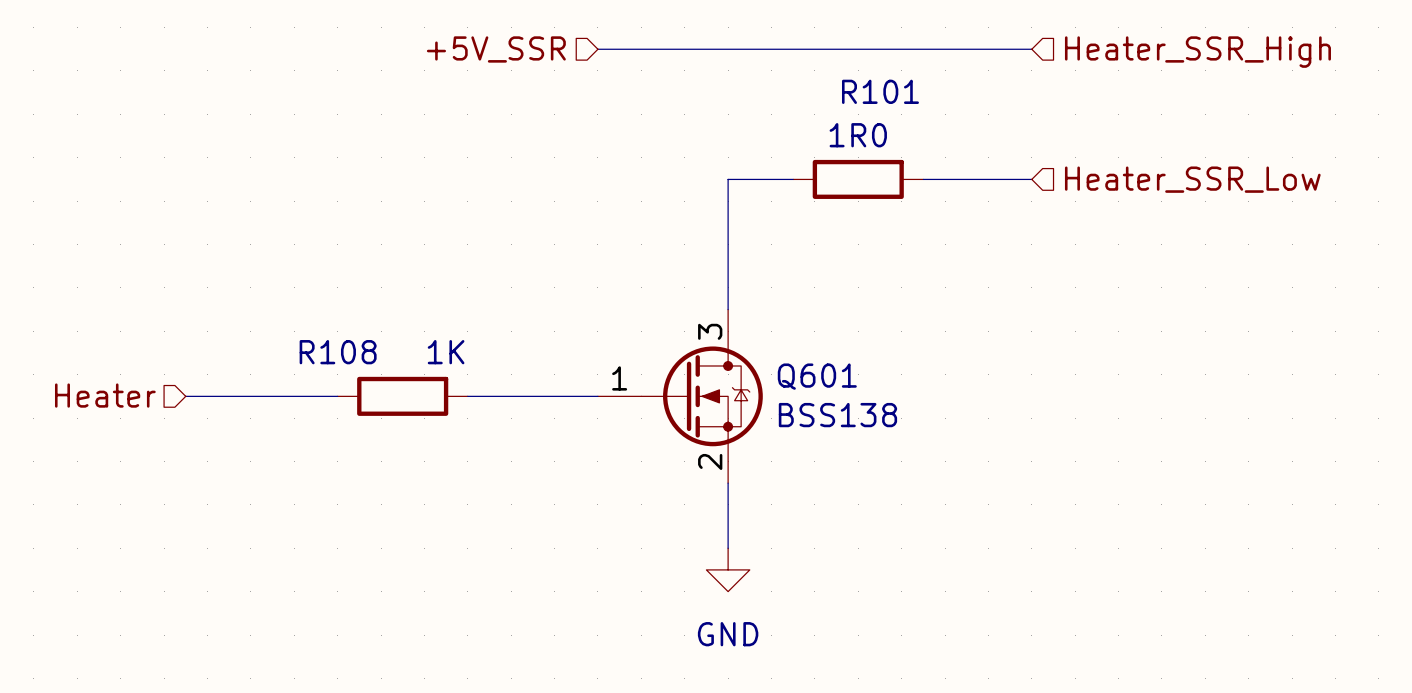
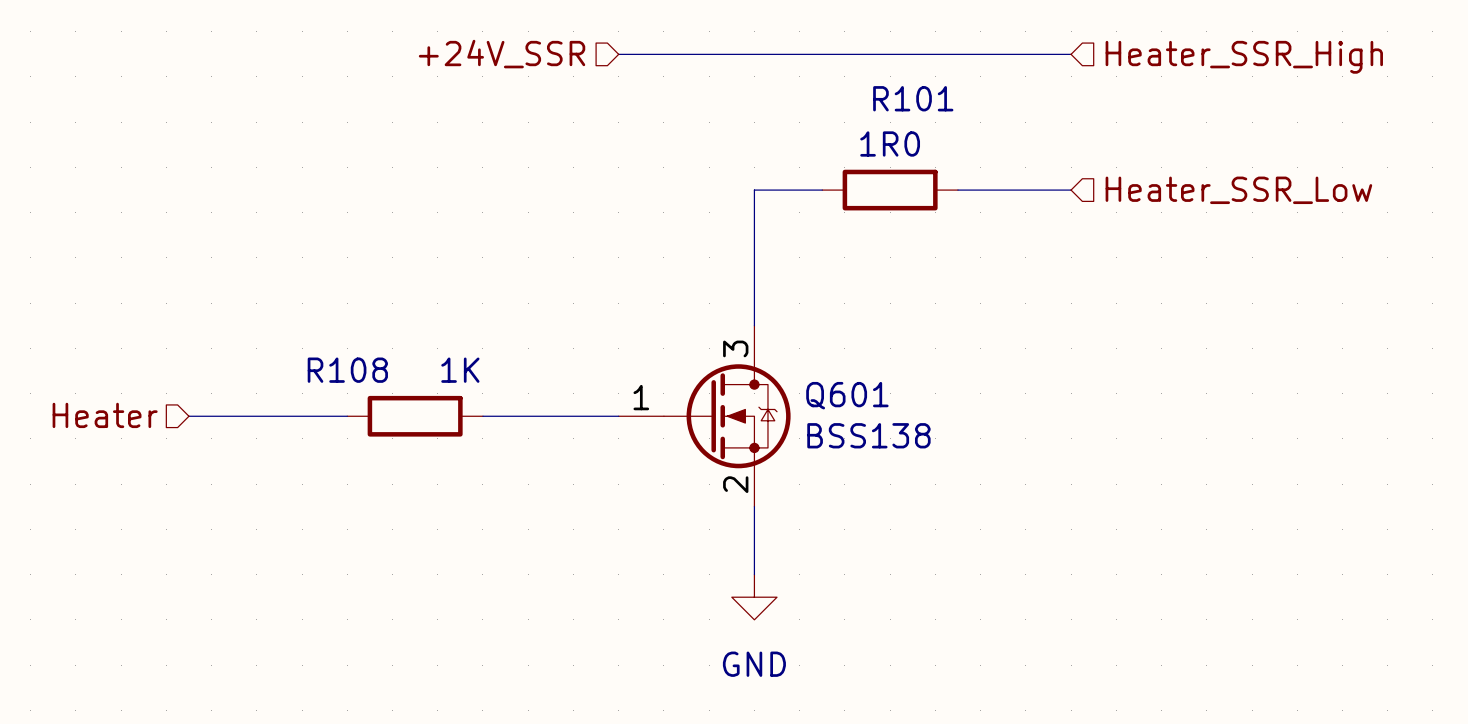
hierarchical label: +5V_SSR (496, 49) -> +24V_SSR (502, 54)

